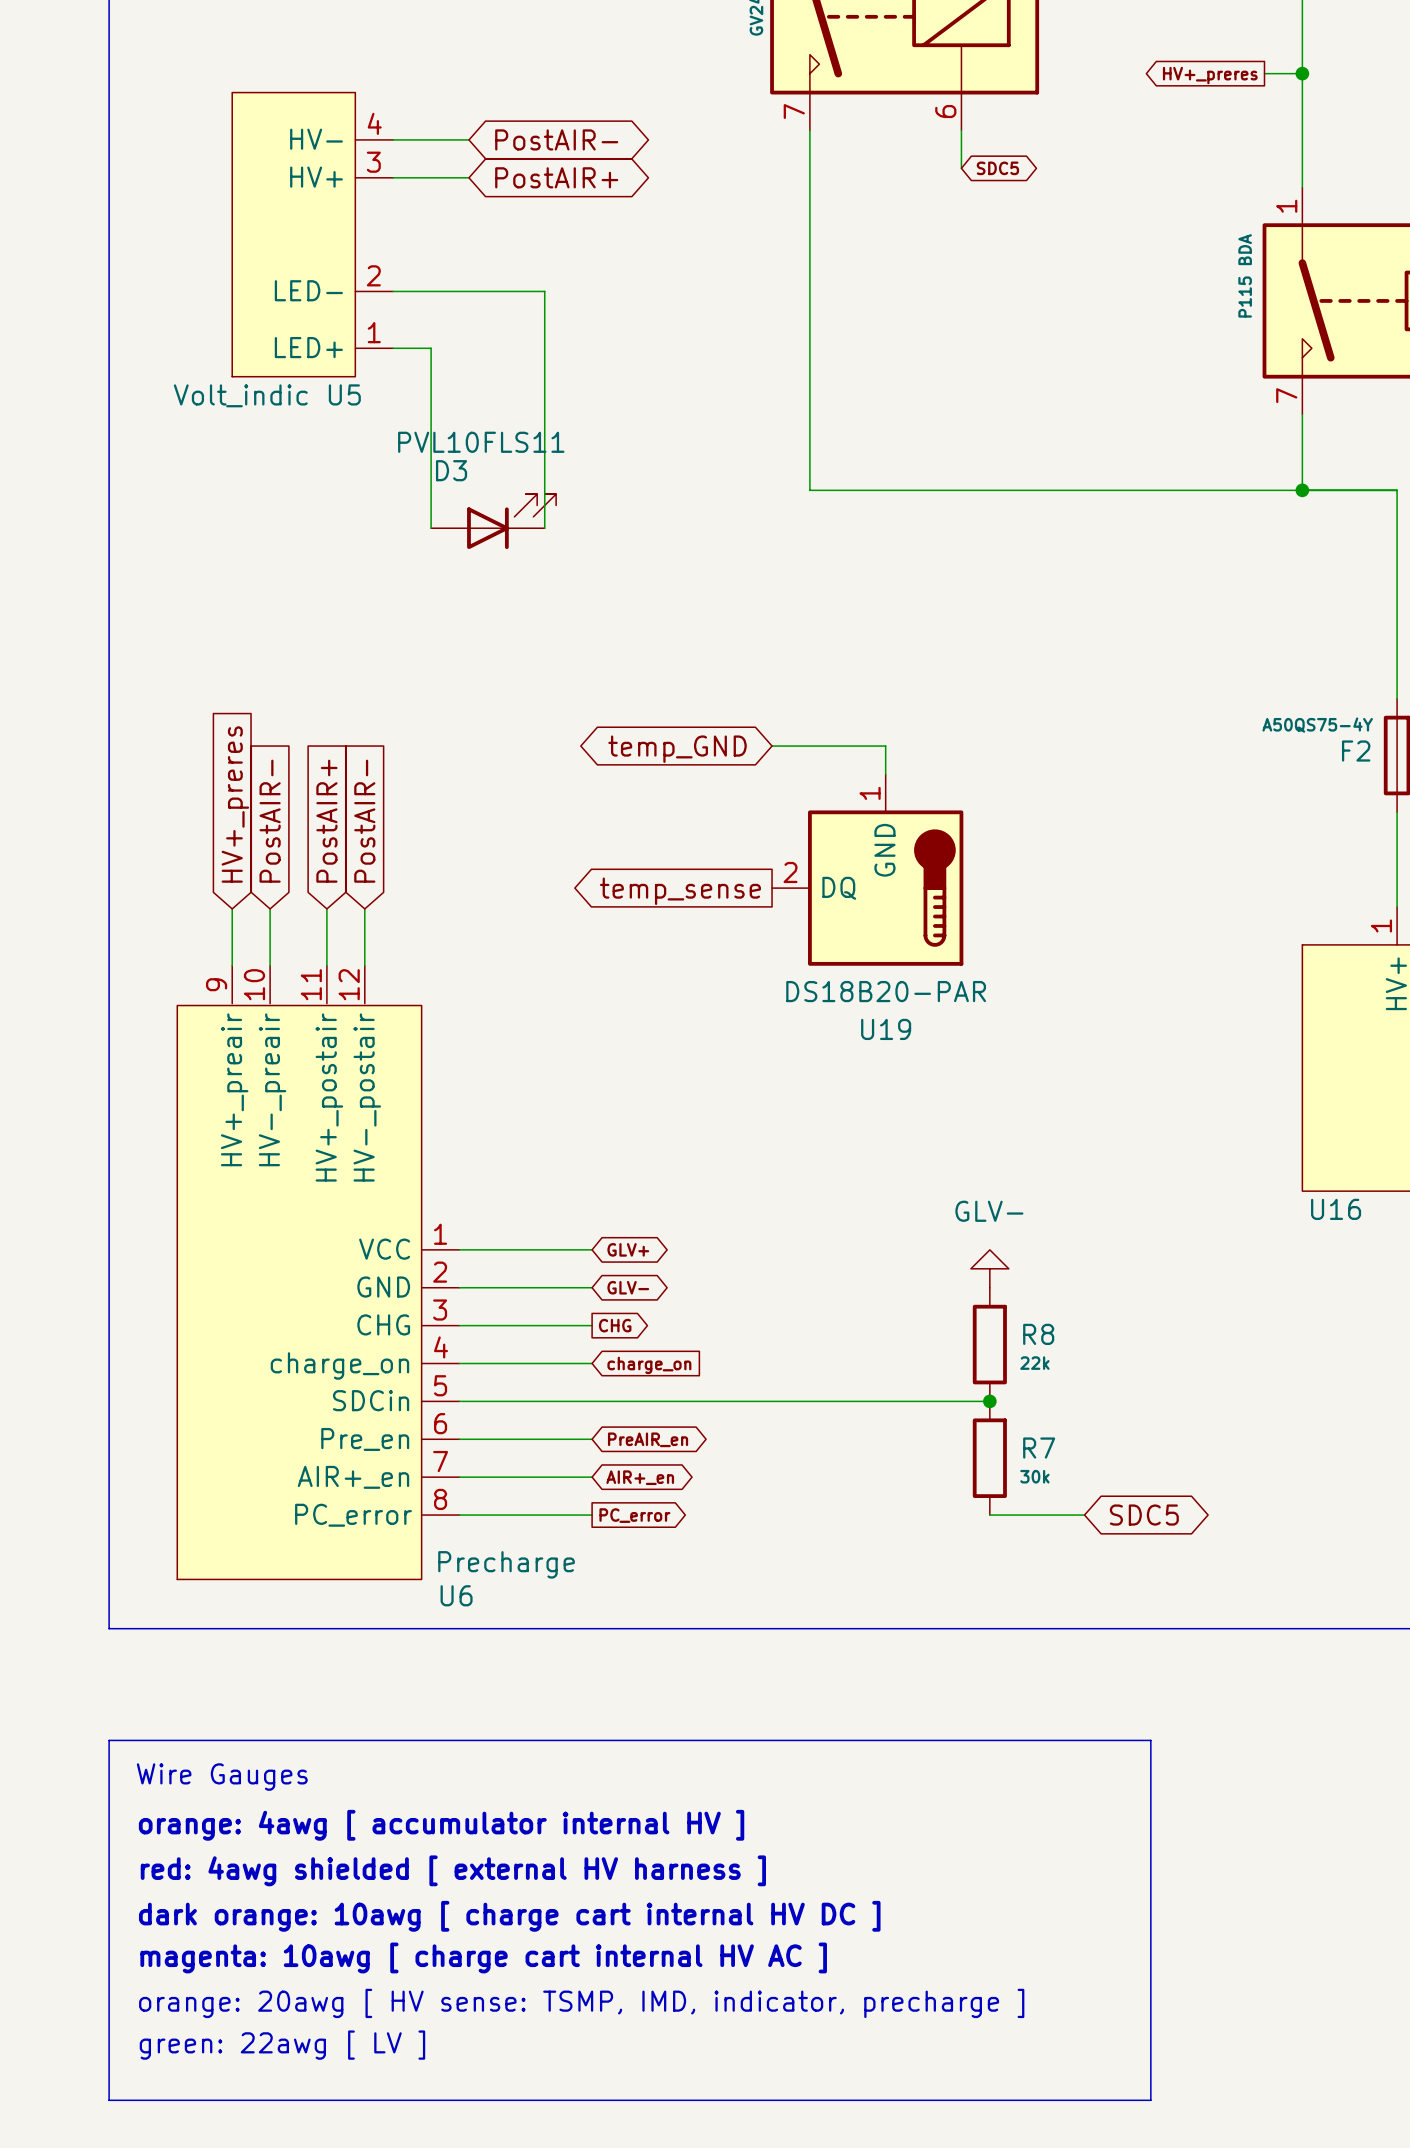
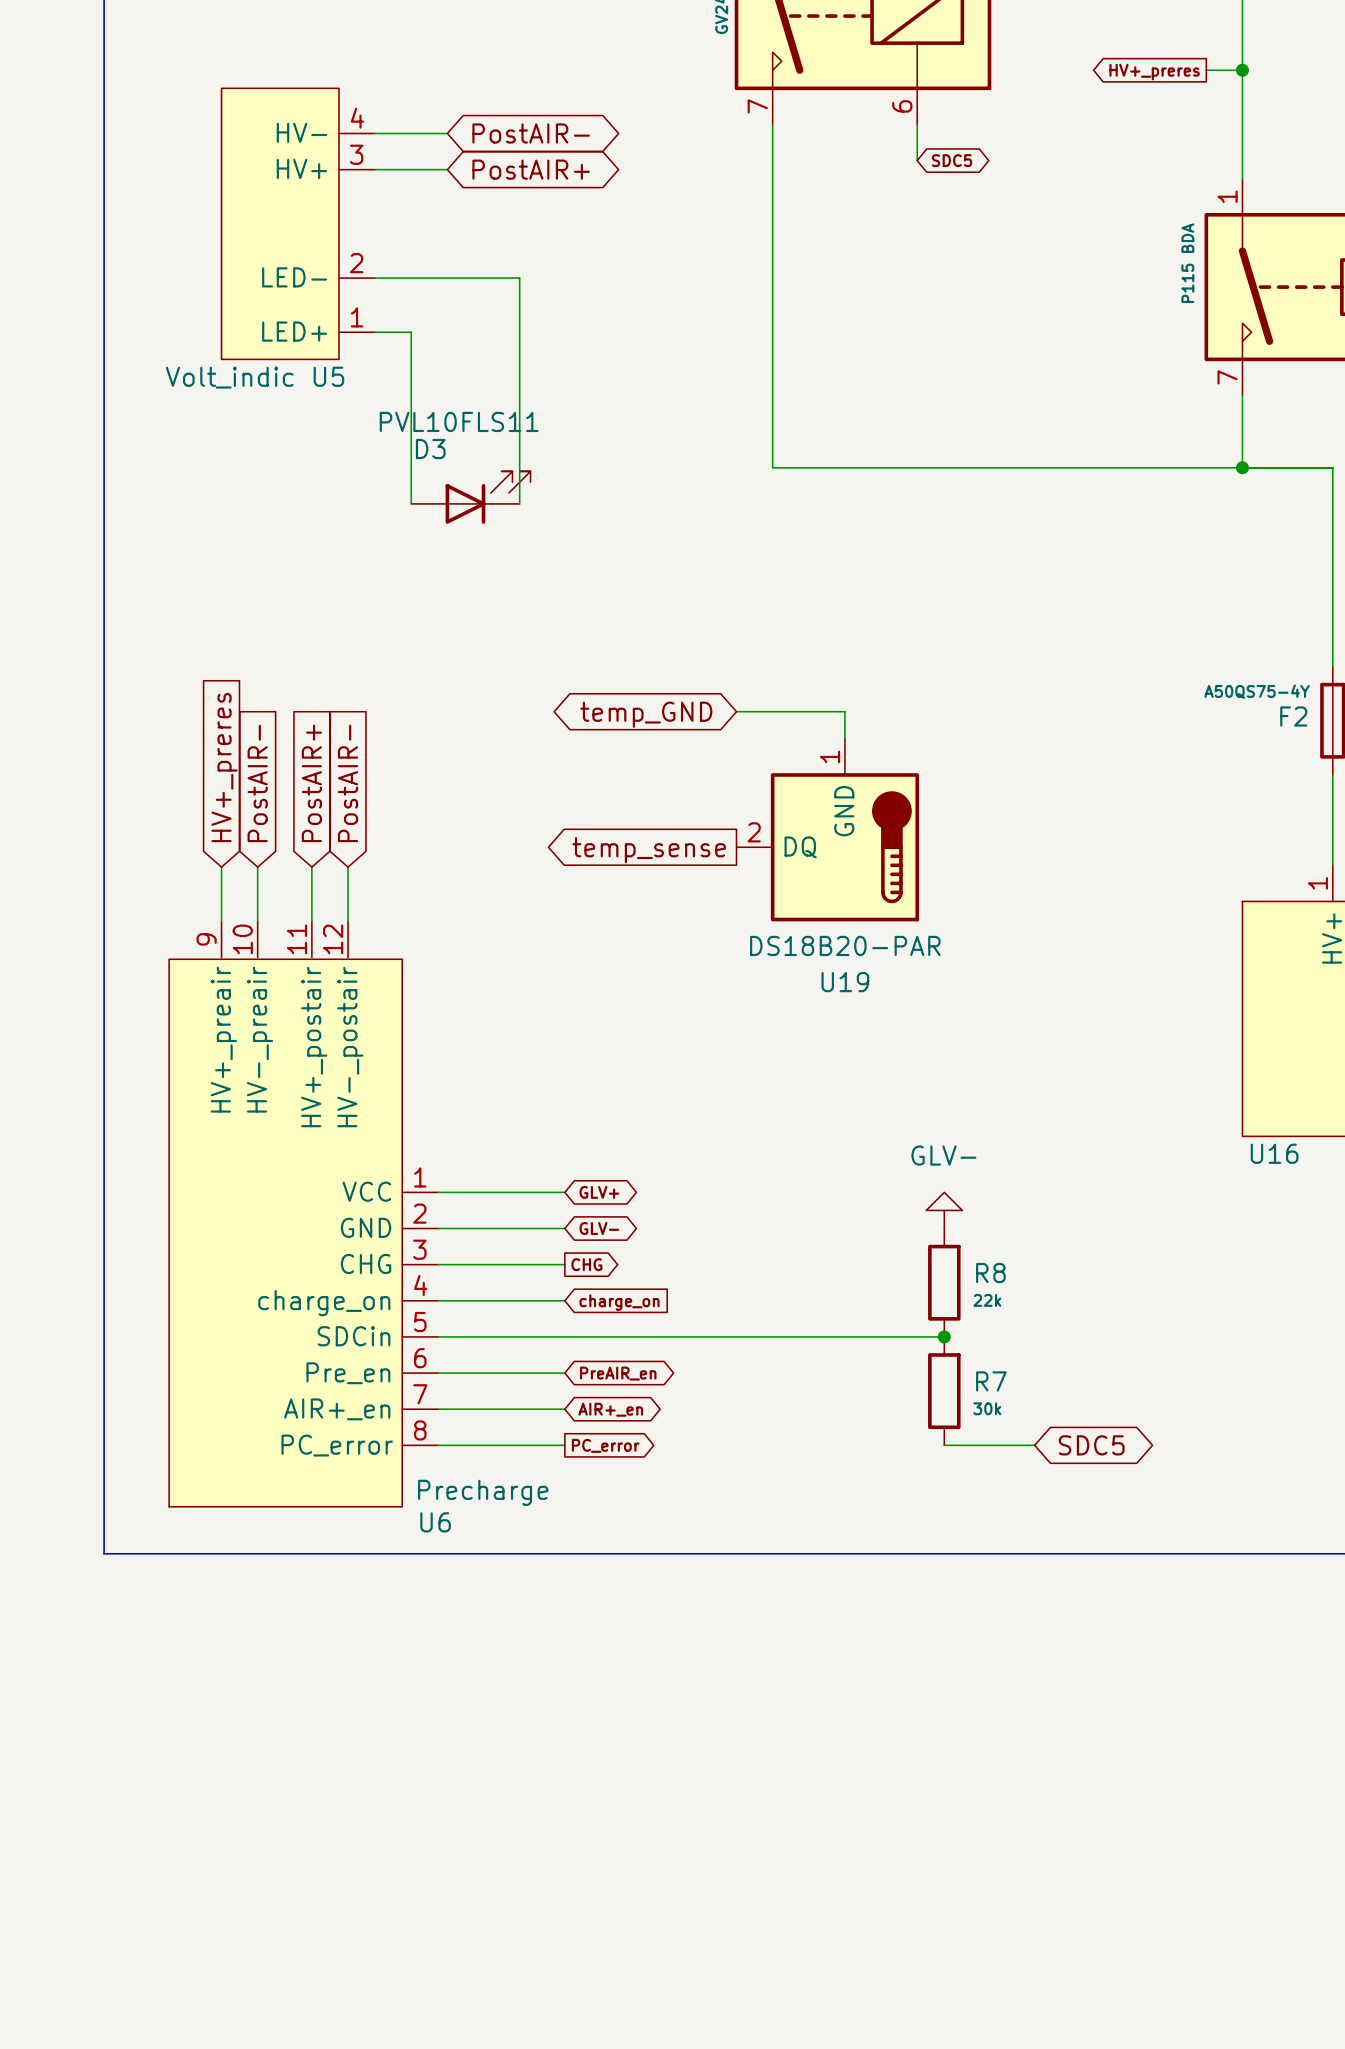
line: (109, 1740) (1150, 1740) (1150, 2100) (109, 2100) (109, 1740) -> none
text: Wire Gauges (222, 1777) -> none
text: orange: 4awg [ accumulator internal HV ] (441, 1825) -> none
text: red: 4awg shielded [ external HV harness ] (453, 1870) -> none
text: dark orange: 10awg [ charge cart internal HV DC ] (509, 1916) -> none
text: magenta: 10awg [ charge cart internal HV AC ] (483, 1957) -> none
text: orange: 20awg [ HV sense: TSMP, IMD, indicator, precharge ] (581, 2003) -> none
text: green: 22awg [ LV ] (282, 2045) -> none

